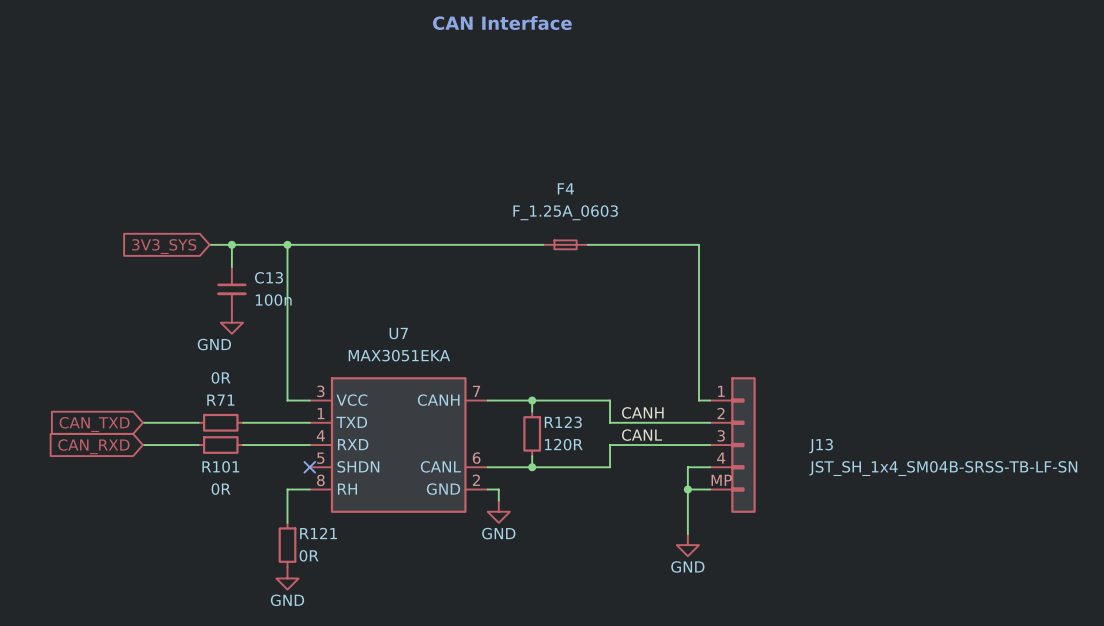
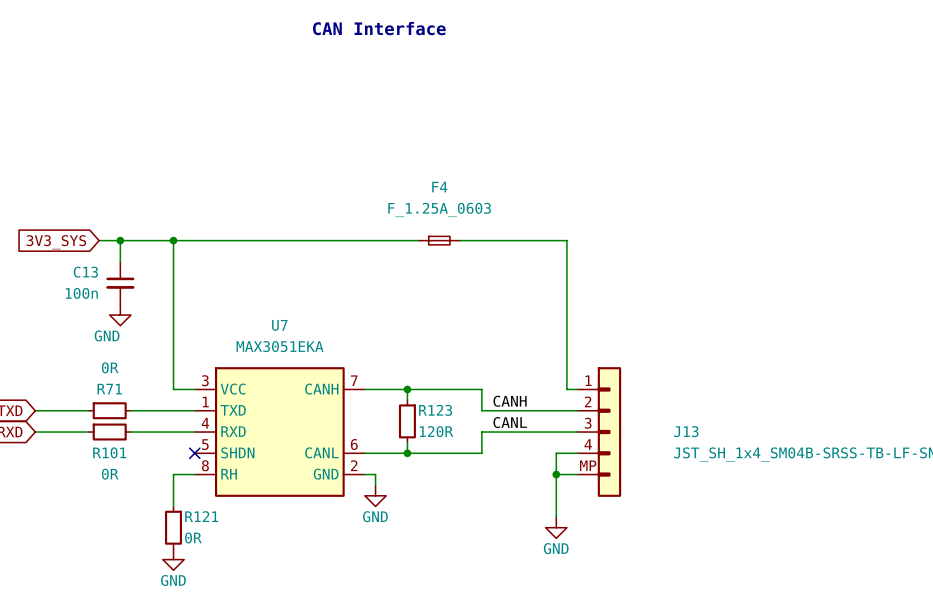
C13 name position: C13 (268, 277) -> C13 (85, 272)
C13 text position: 100n (273, 300) -> 100n (81, 293)

